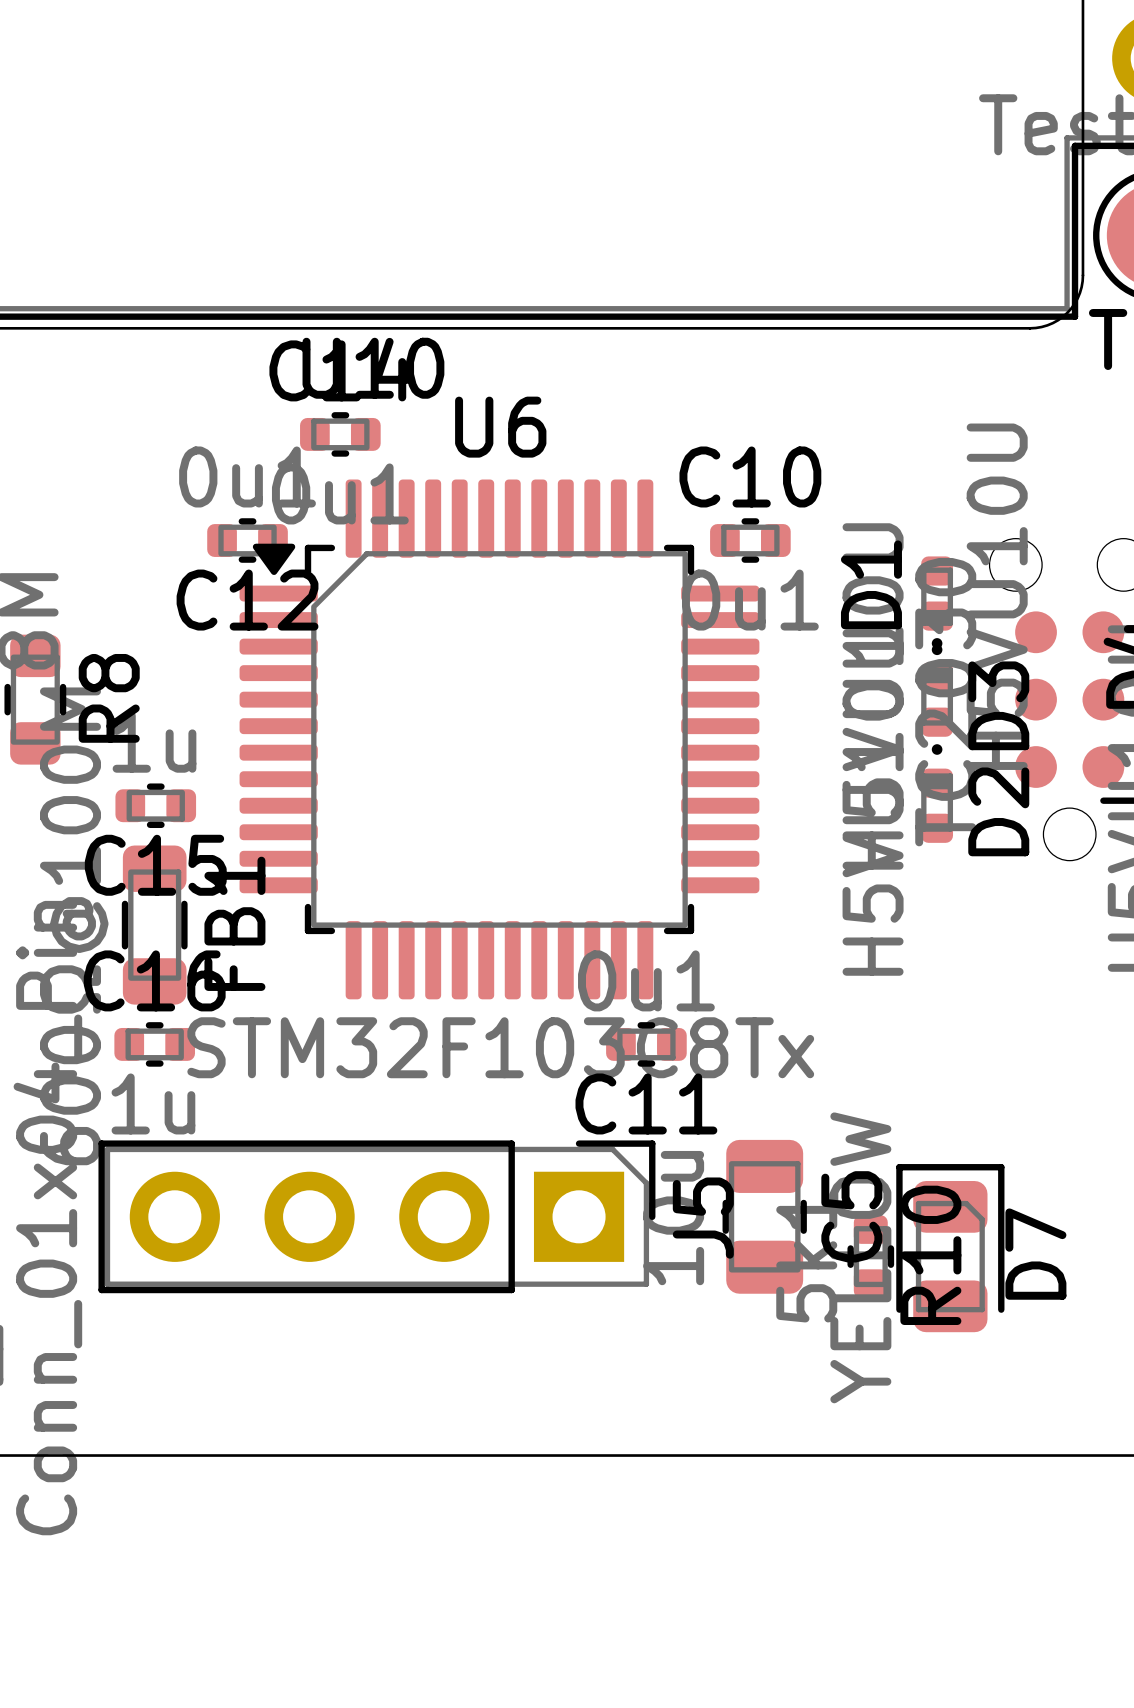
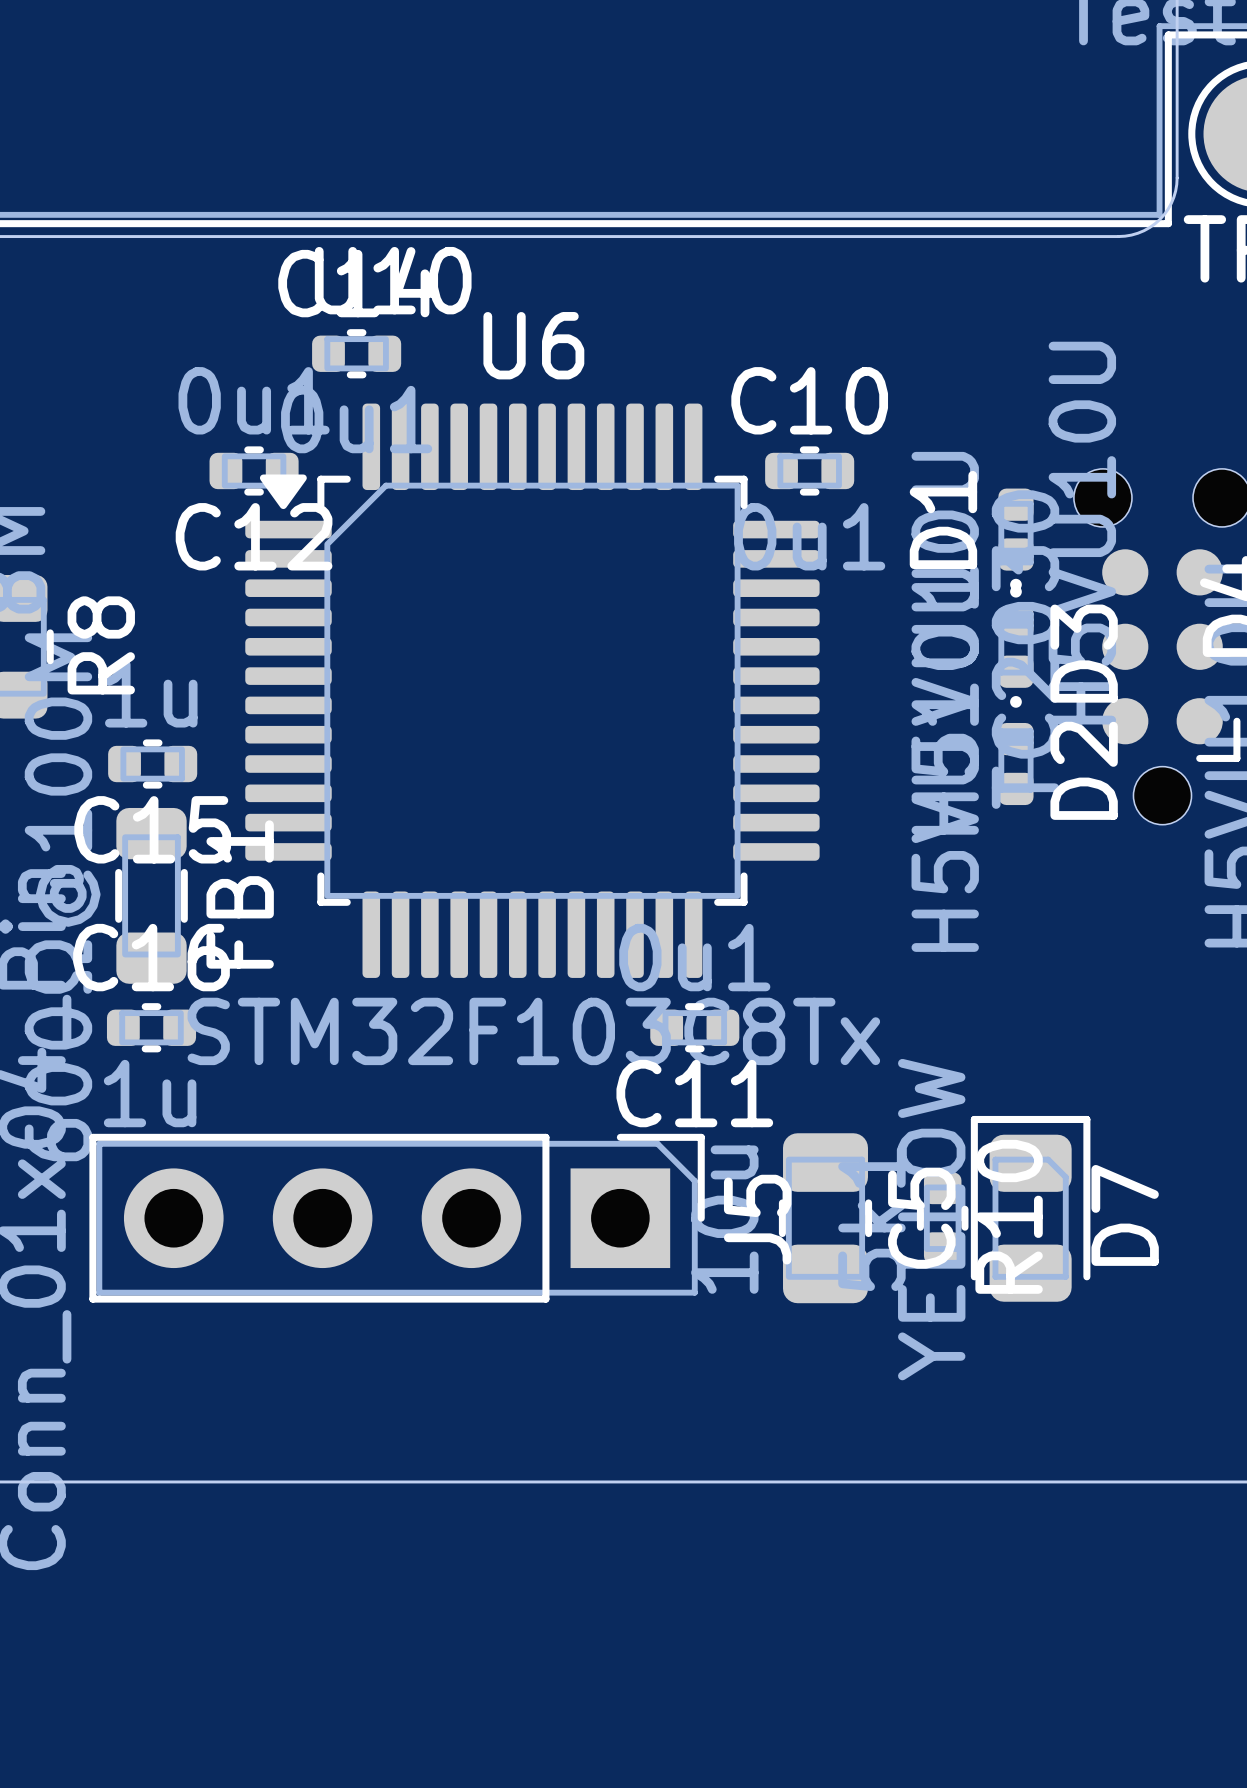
D7 position: (950, 1248) -> (1030, 1208)
R10 position: (870, 1256) -> (942, 1218)

